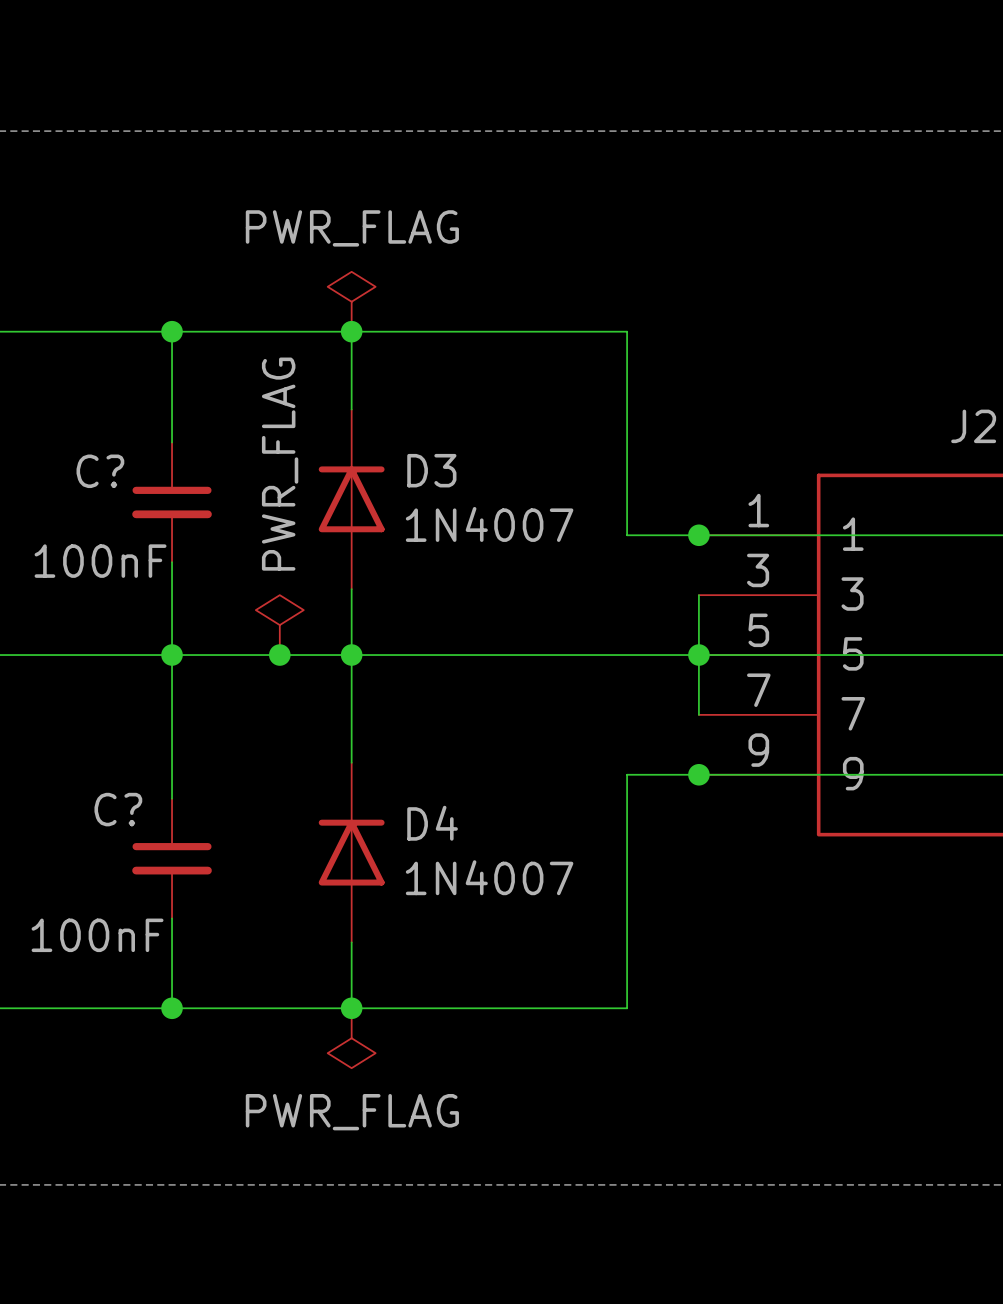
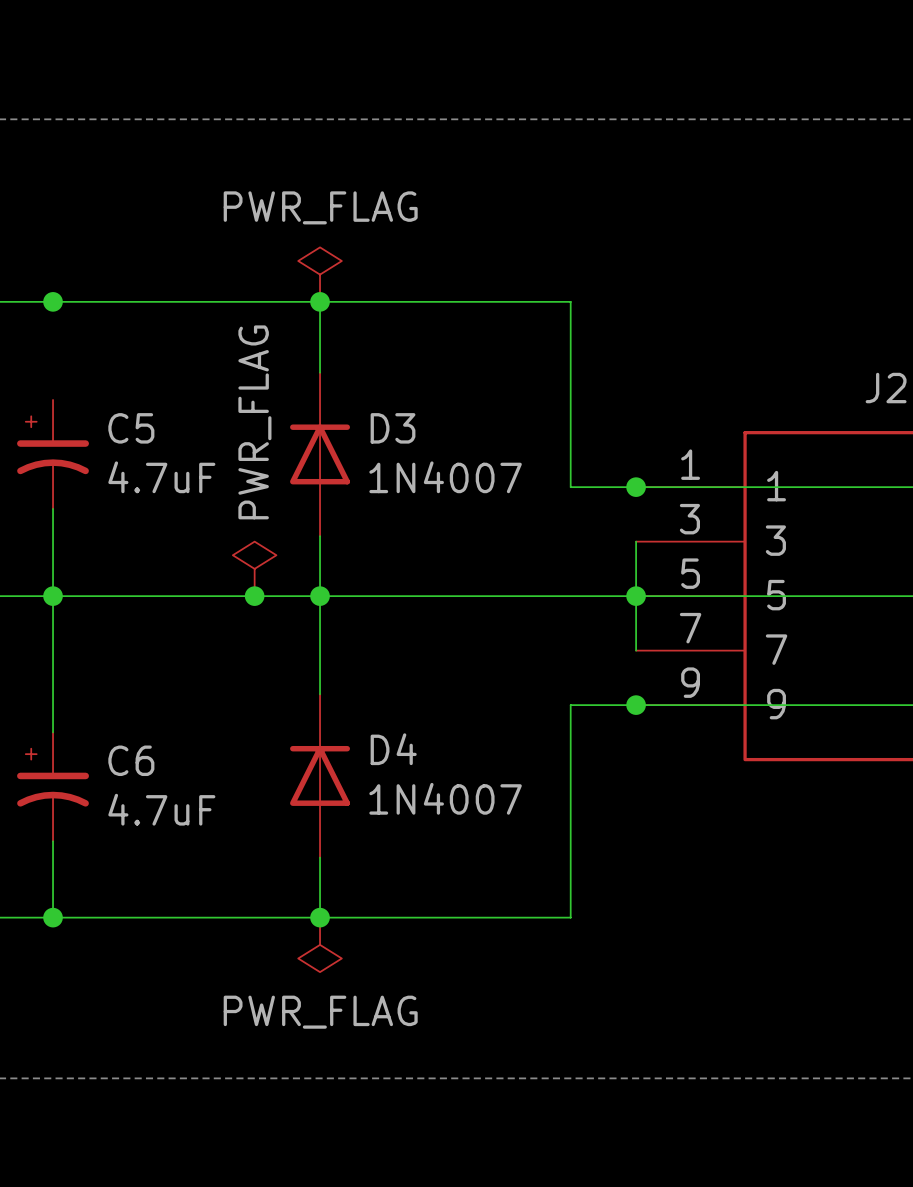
wire: (172, 331) (172, 442) -> none
junction position: (172, 331) -> (53, 301)
C5: none -> 4.7uF (53, 454)
C?: 100nF (172, 502) -> none
wire: none -> (53, 508) (53, 732)
wire: (172, 562) (172, 798) -> none
junction position: (172, 655) -> (53, 596)
C?: 100nF (172, 858) -> none
C6: none -> 4.7uF (53, 786)
wire: (172, 918) (172, 1008) -> none
wire: none -> (53, 841) (53, 917)
junction position: (172, 1008) -> (53, 917)

